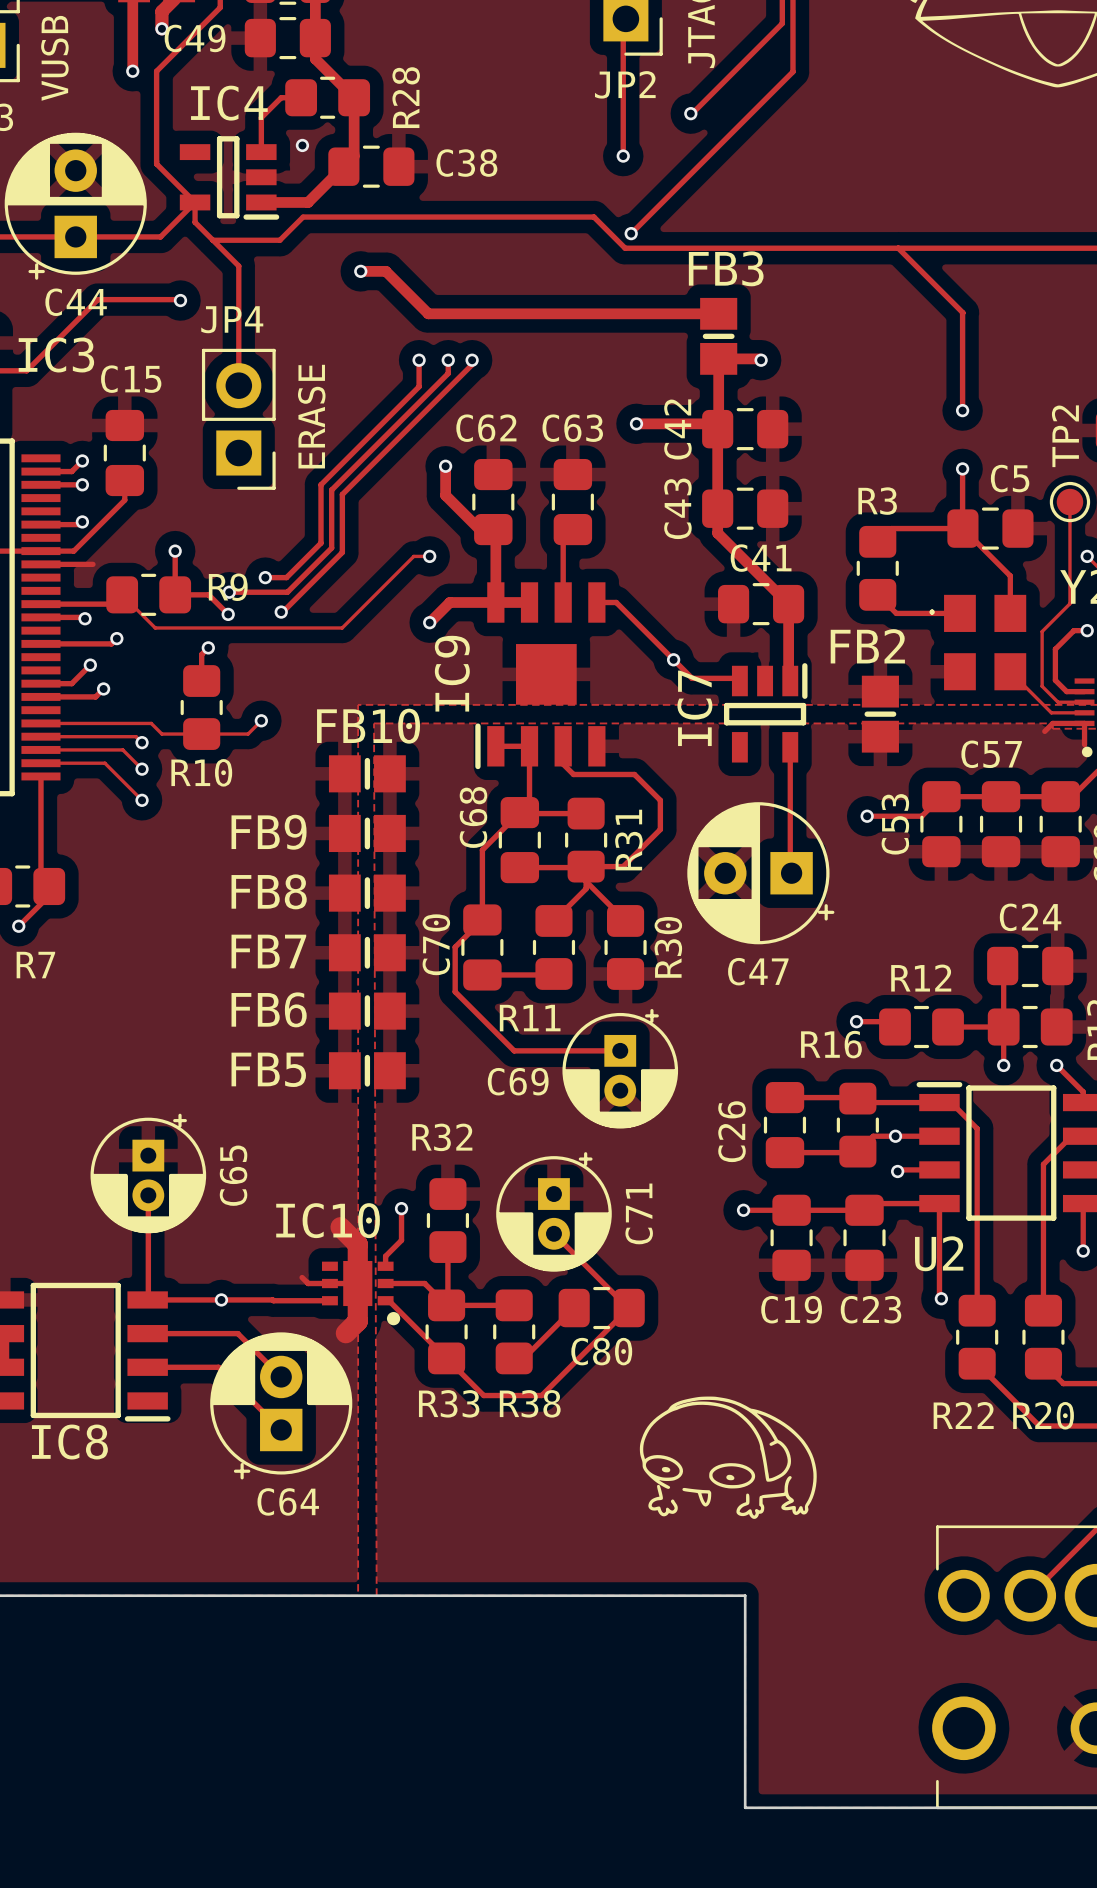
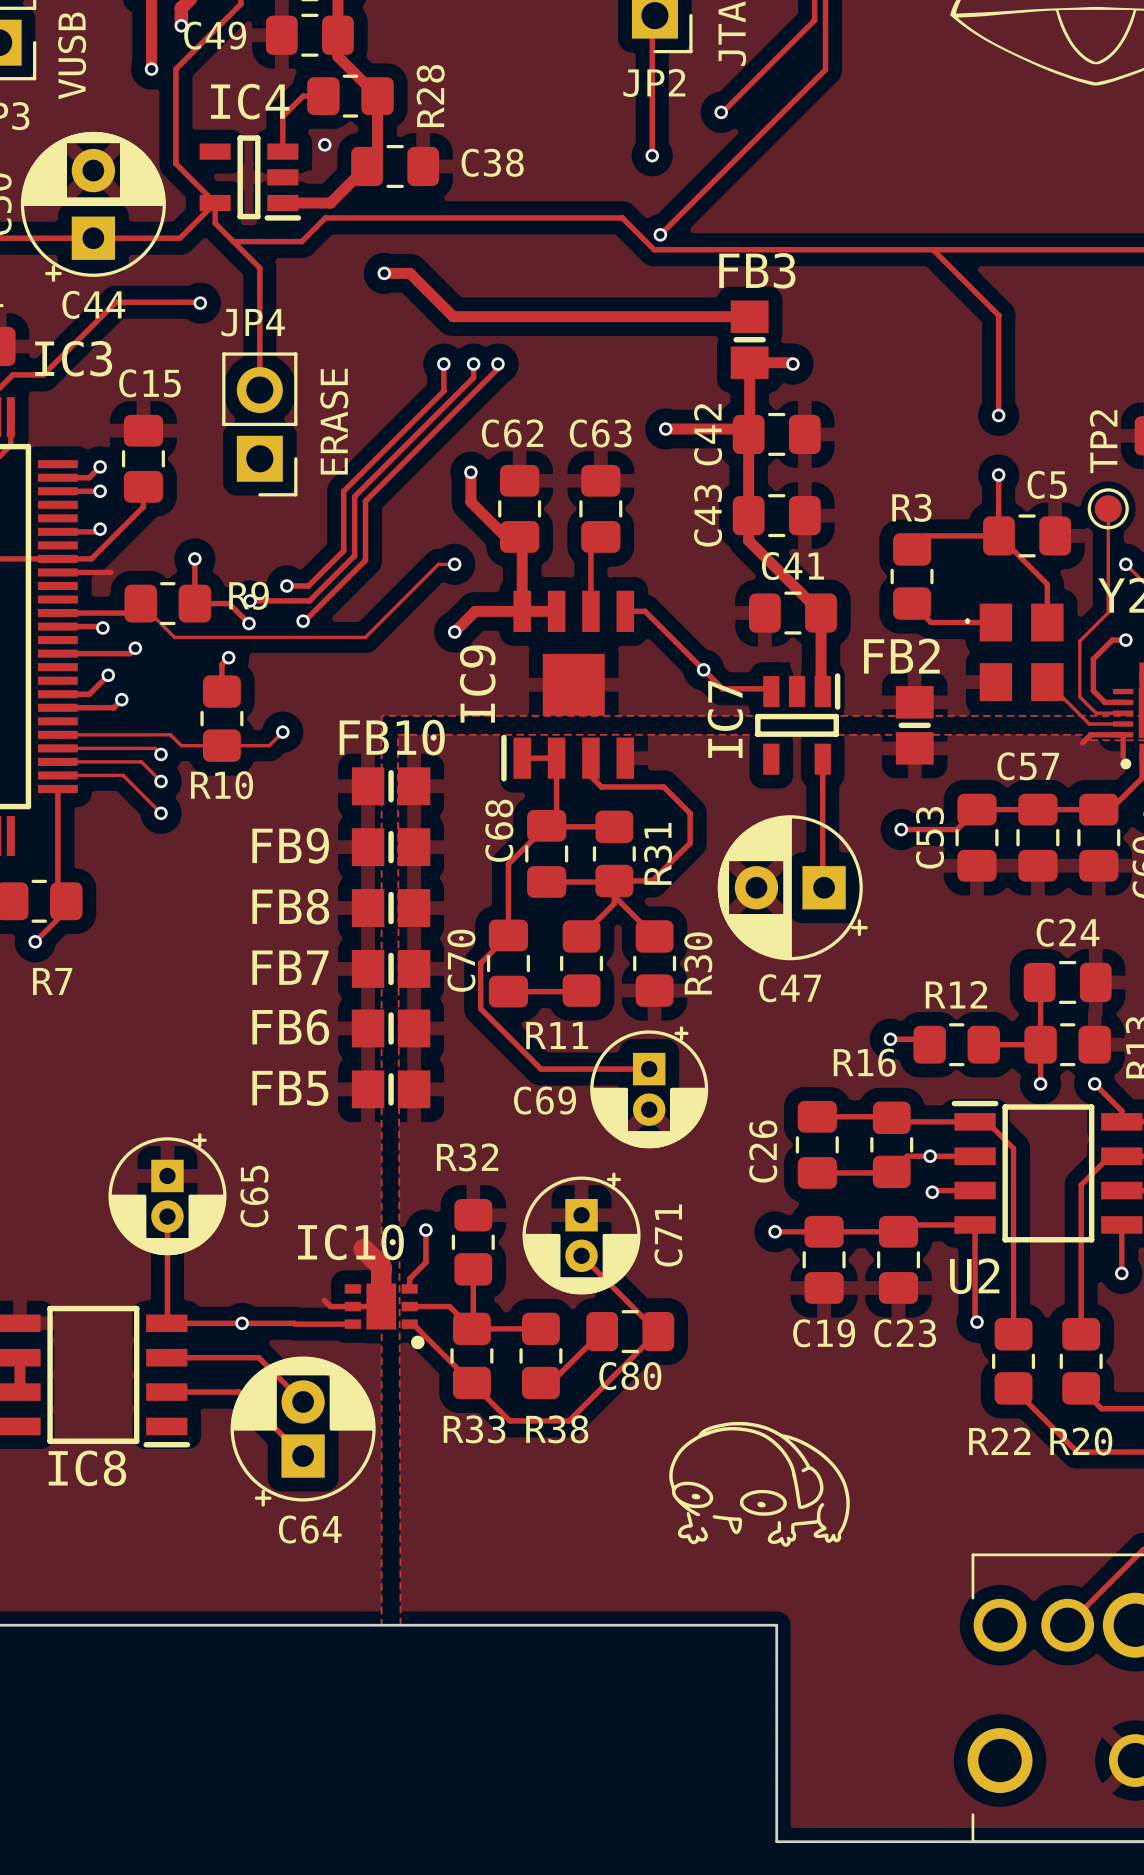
track: (357, 1283) (357, 1321) (345, 1333) -> none

